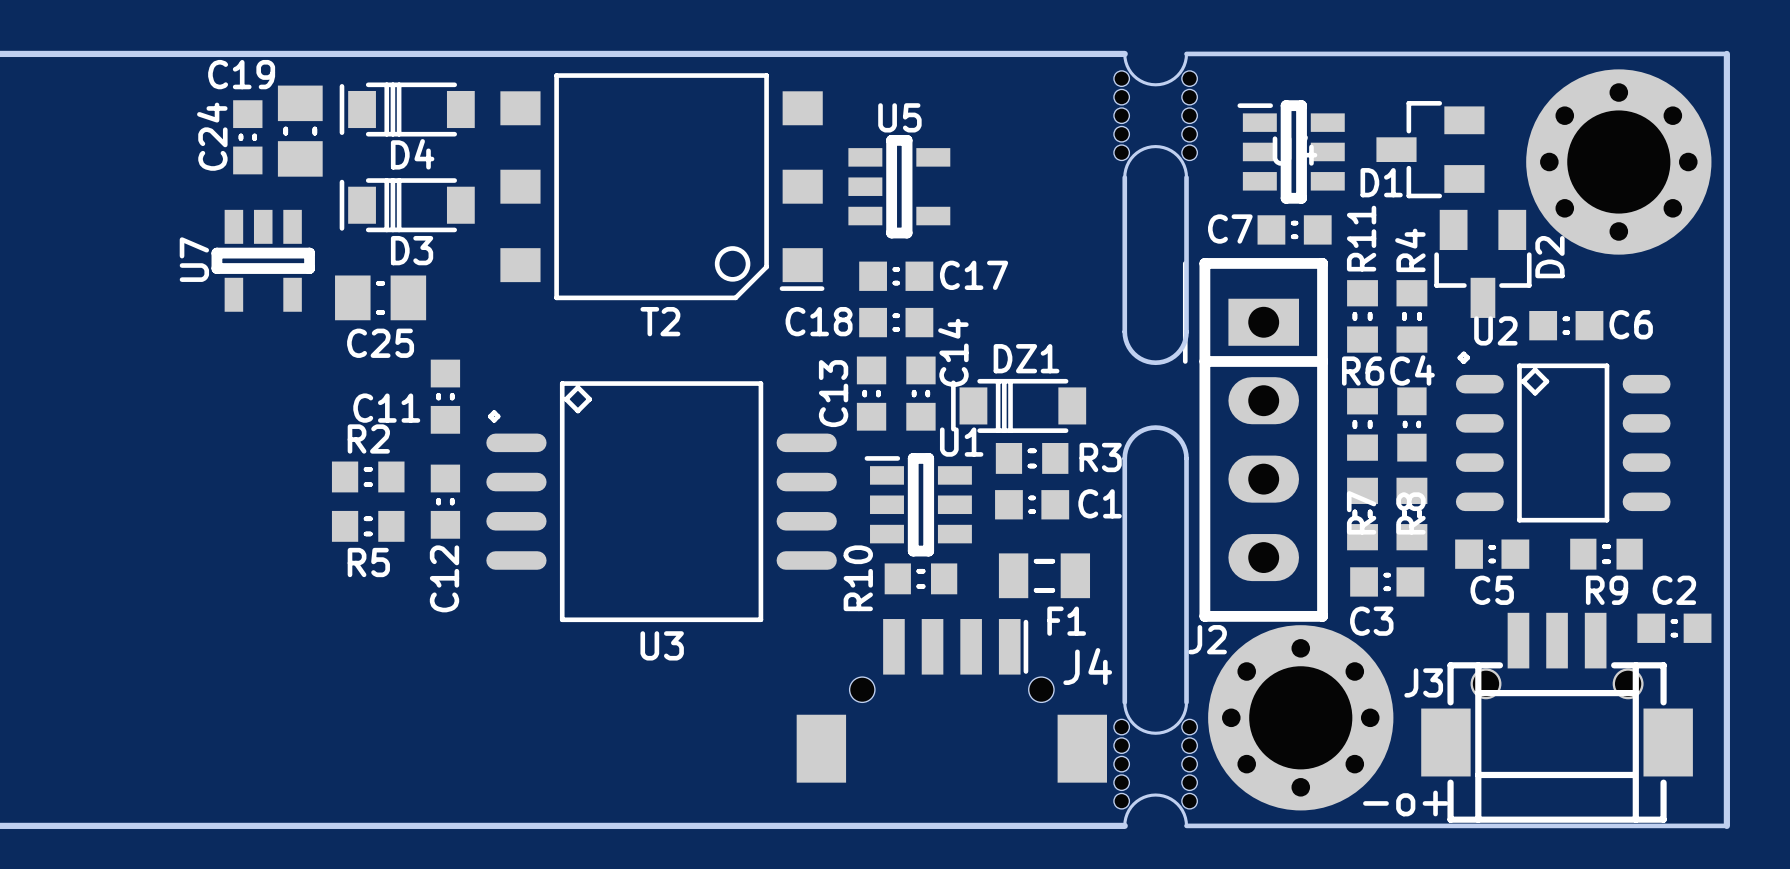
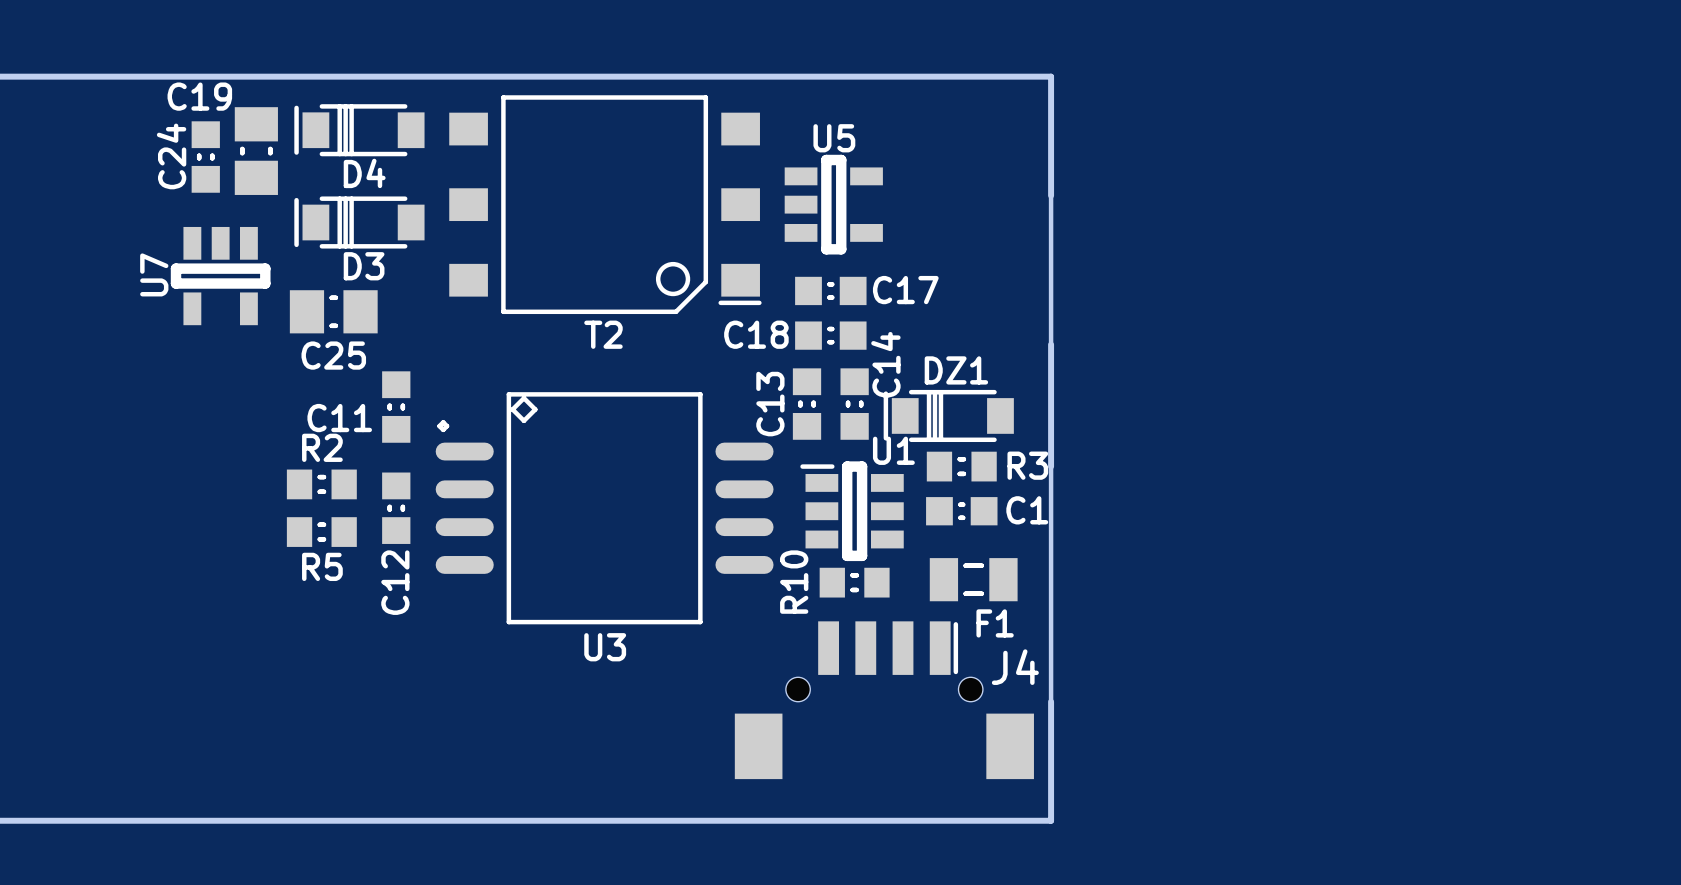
board edge: none -> (1051, 76) (1051, 195)
board edge: (1186, 53) (1726, 53) (1726, 825) (1186, 825) -> none
part: (1155, 115) -> none
D1: (1430, 149) -> none
part: (1291, 151) -> none
part: (1618, 162) -> none
board edge: (1186, 177) (1186, 331) (1184, 343) (1180, 350) (1171, 358) (1159, 362) (1151, 362) (1140, 358) (1131, 350) (1125, 339) (1124, 331) -> (1051, 466) (1051, 344)
C7: (1294, 229) -> none
D2: (1482, 263) -> none
R11: (1362, 316) -> none
R4: (1411, 316) -> none
C6: (1566, 325) -> none
R6: (1362, 424) -> none
C4: (1411, 424) -> none
U2: (1563, 437) -> none
J2: (1255, 439) -> none
board edge: (1124, 458) (1125, 450) (1131, 439) (1140, 431) (1151, 427) (1163, 428) (1174, 433) (1180, 439) (1185, 450) (1186, 702) -> none
part: (1362, 514) -> none
part: (1411, 514) -> none
C5: (1492, 554) -> none
R9: (1606, 554) -> none
C3: (1387, 581) -> none
C2: (1674, 628) -> none
board edge: none -> (1051, 701) (1051, 820)
part: (1300, 717) -> none
J3: (1557, 717) -> none
part: (1155, 764) -> none
text: -o+ (1405, 803) -> none

